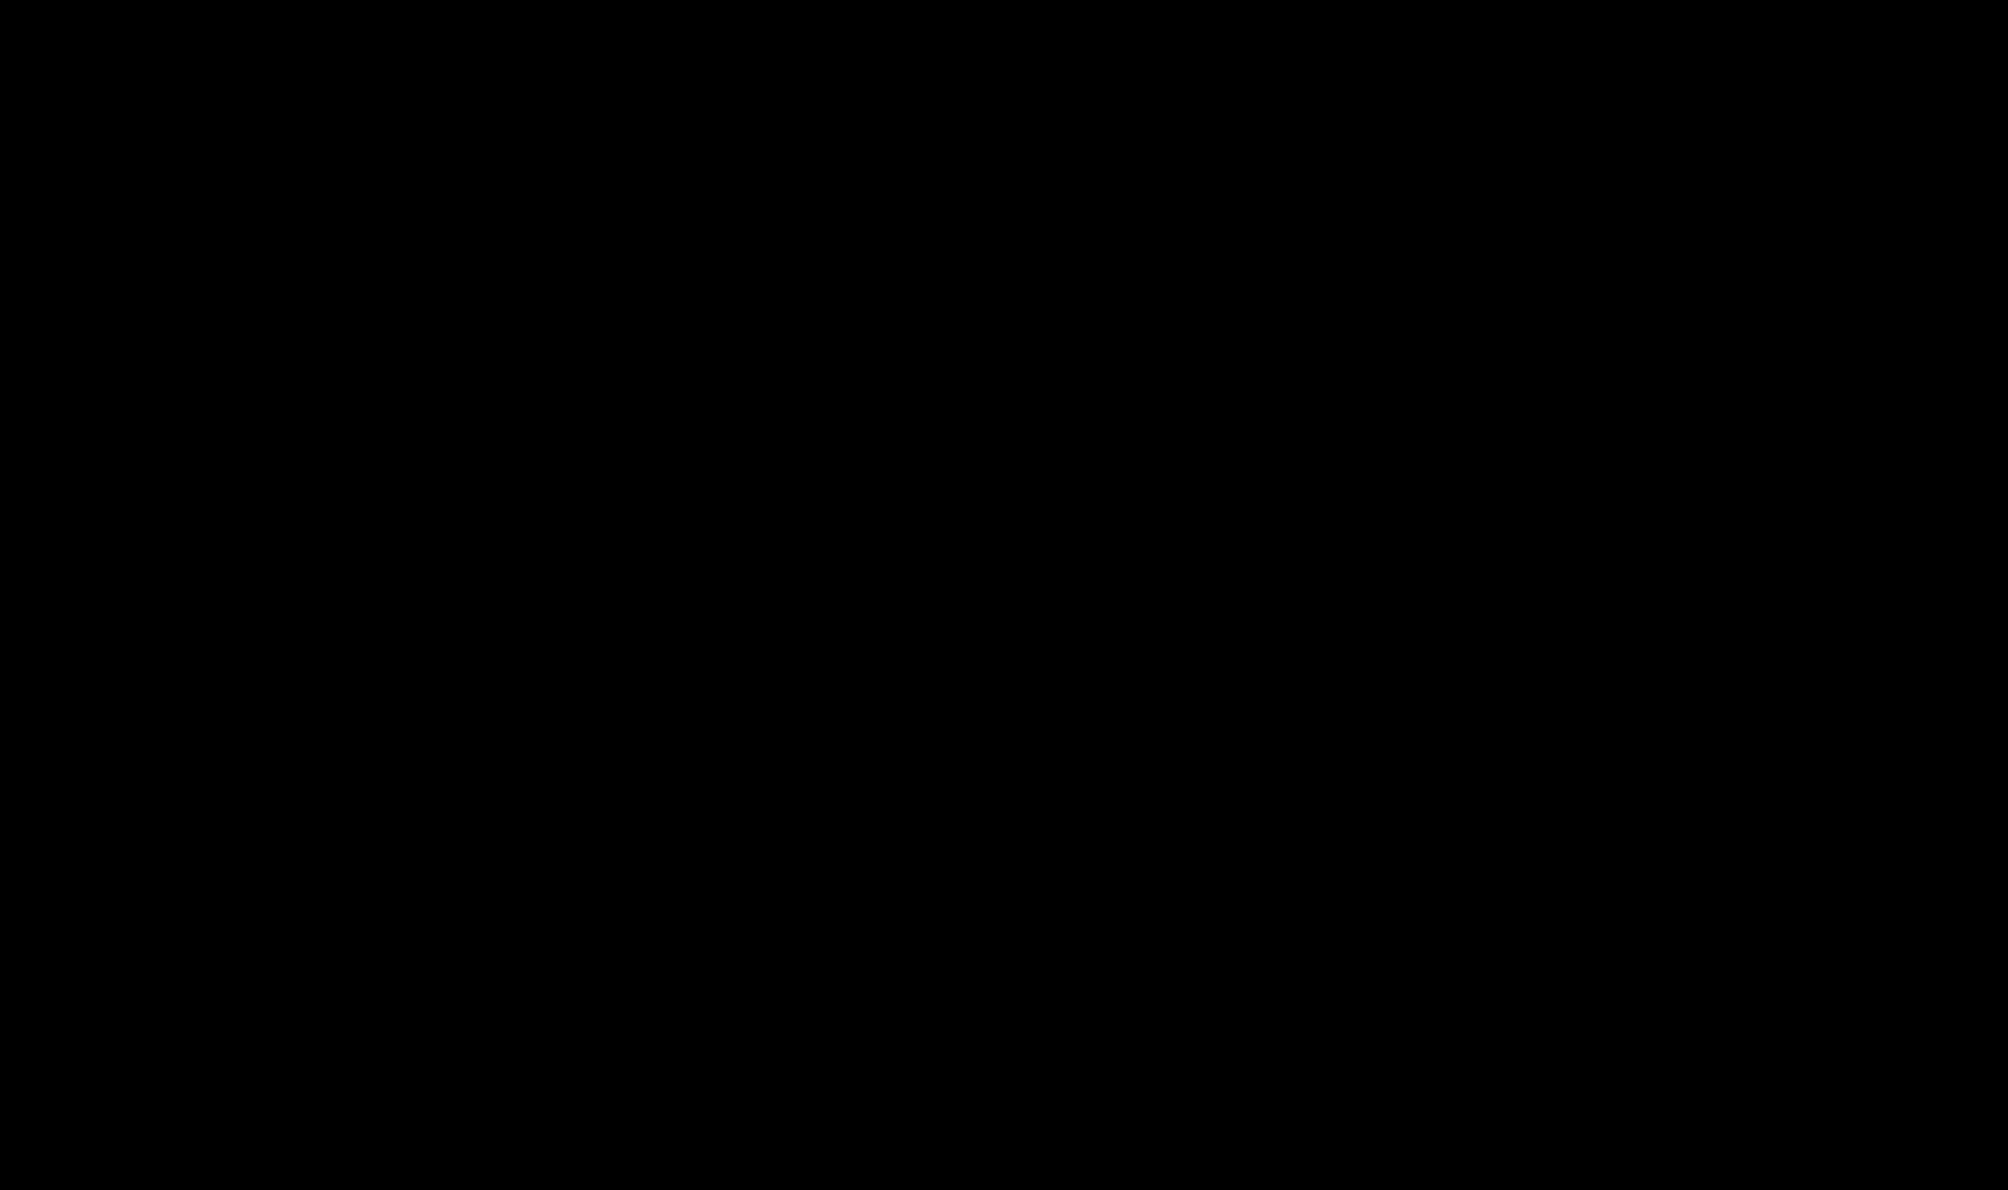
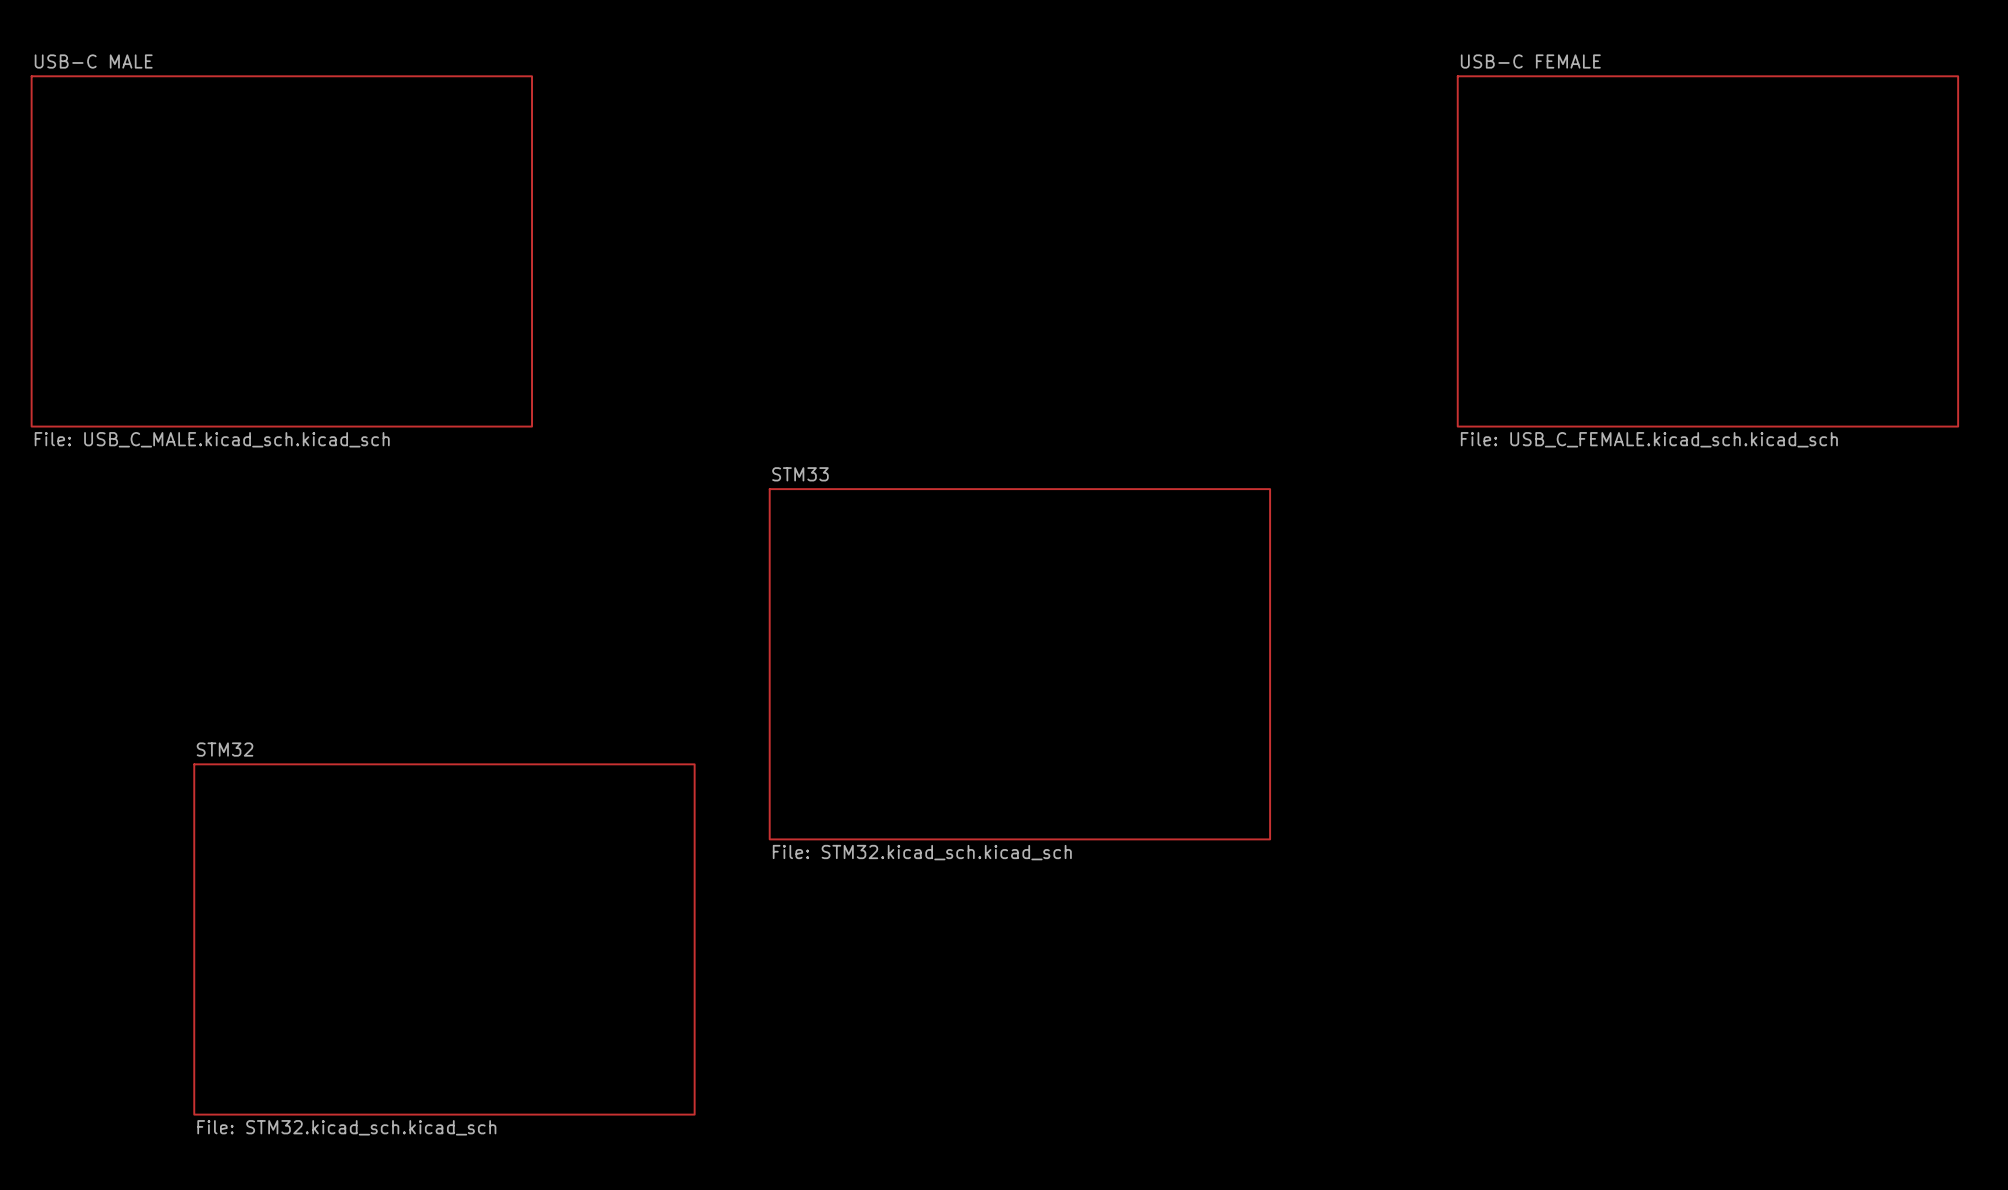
sheet USB-C MALE: none -> File: USB_C_MALE.kicad_sch.kicad_sch (281, 251)
sheet USB-C FEMALE: none -> File: USB_C_FEMALE.kicad_sch.kicad_sch (1707, 251)
sheet STM33: none -> File: STM32.kicad_sch.kicad_sch (1019, 664)
sheet STM32: none -> File: STM32.kicad_sch.kicad_sch (444, 939)

